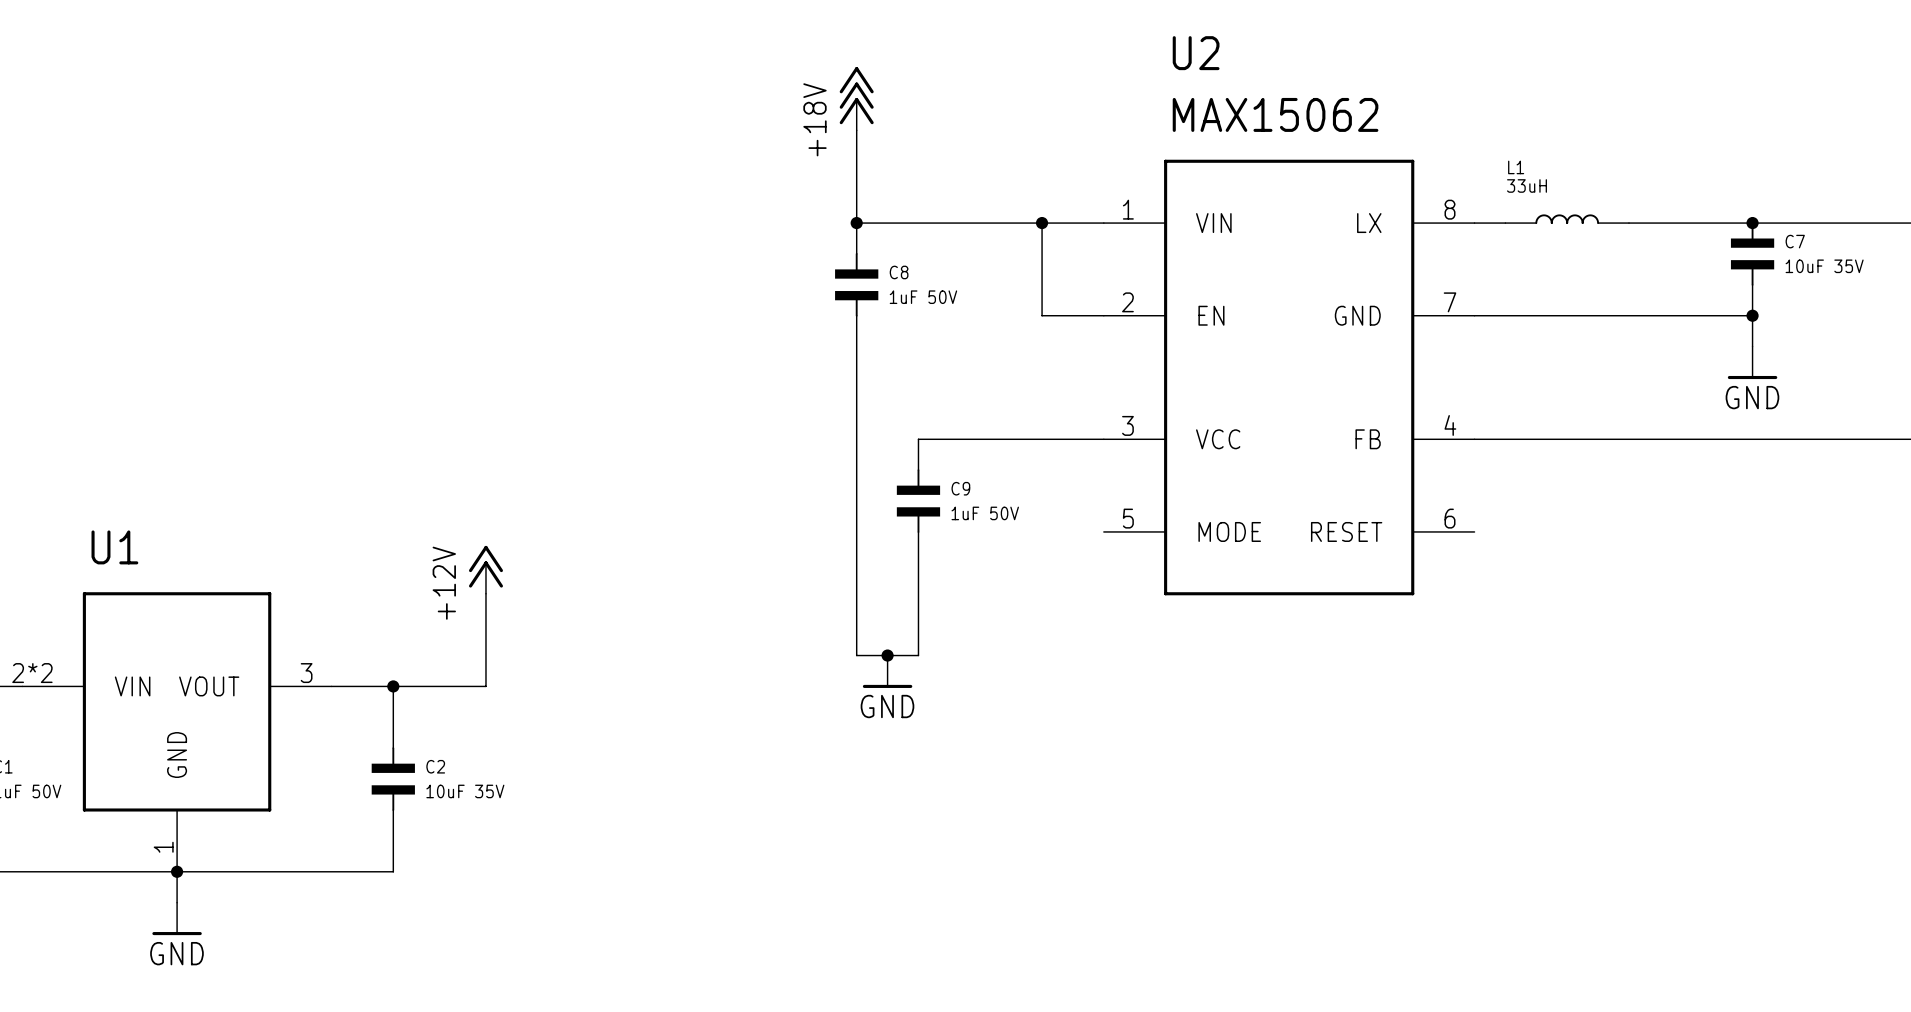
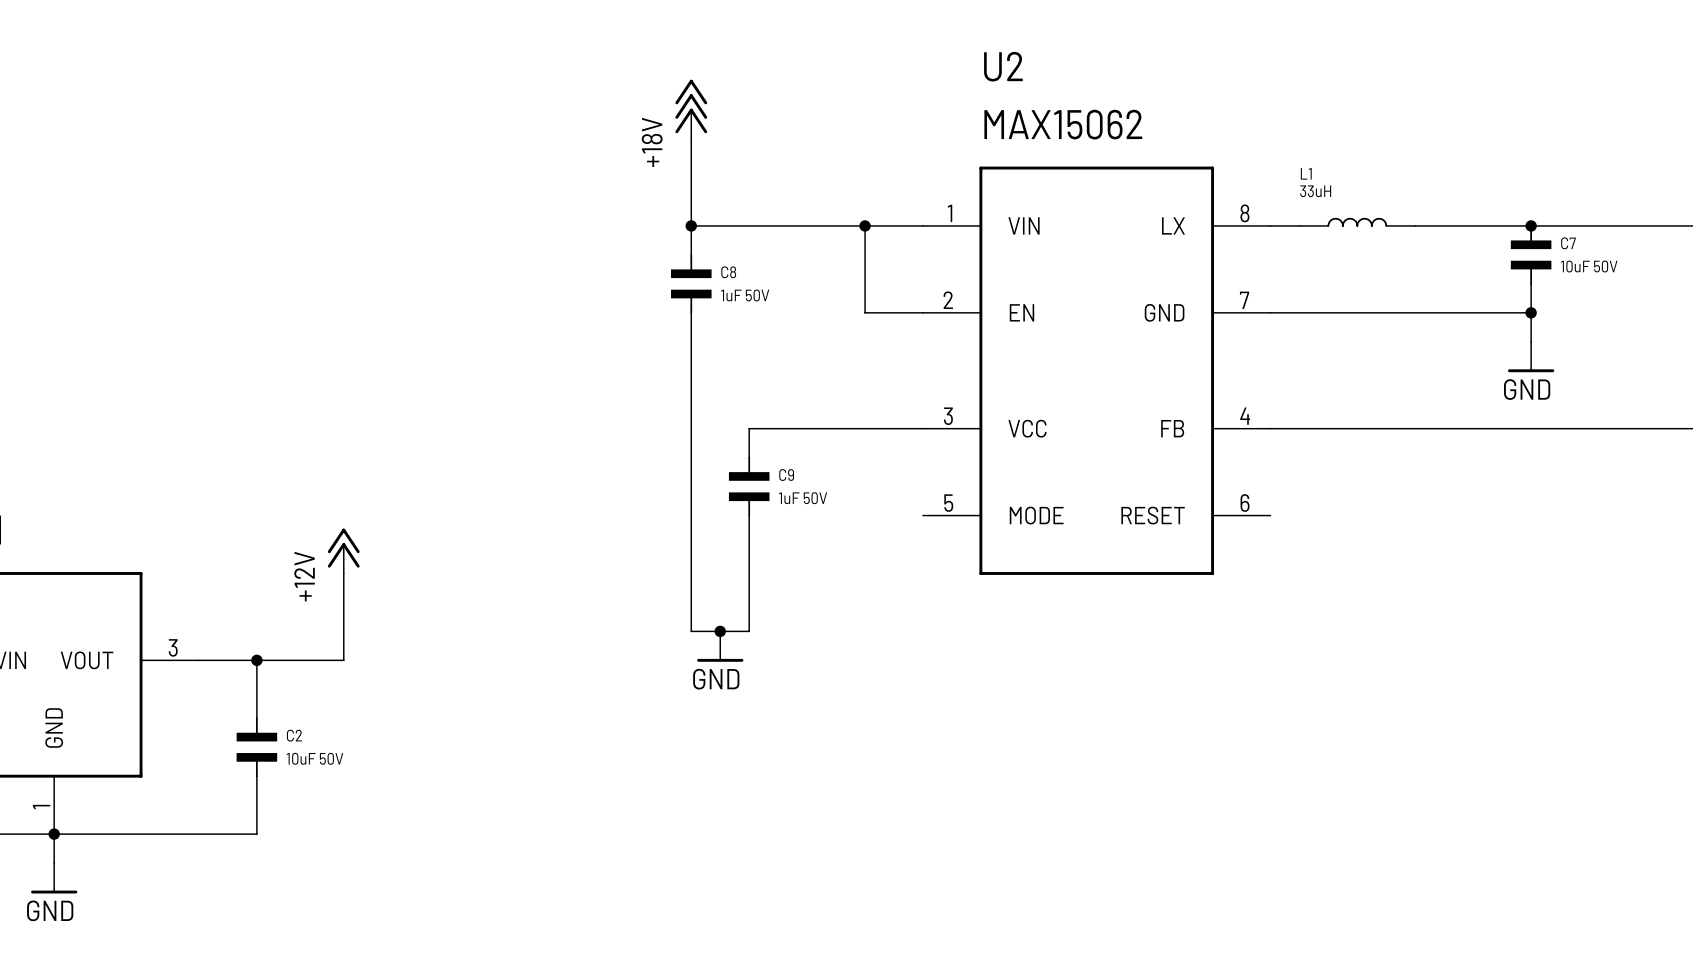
C7 value: 10uF 35V (1824, 266) -> 10uF 50V (1589, 266)
C2 value: 10uF 35V (465, 791) -> 10uF 50V (314, 758)

